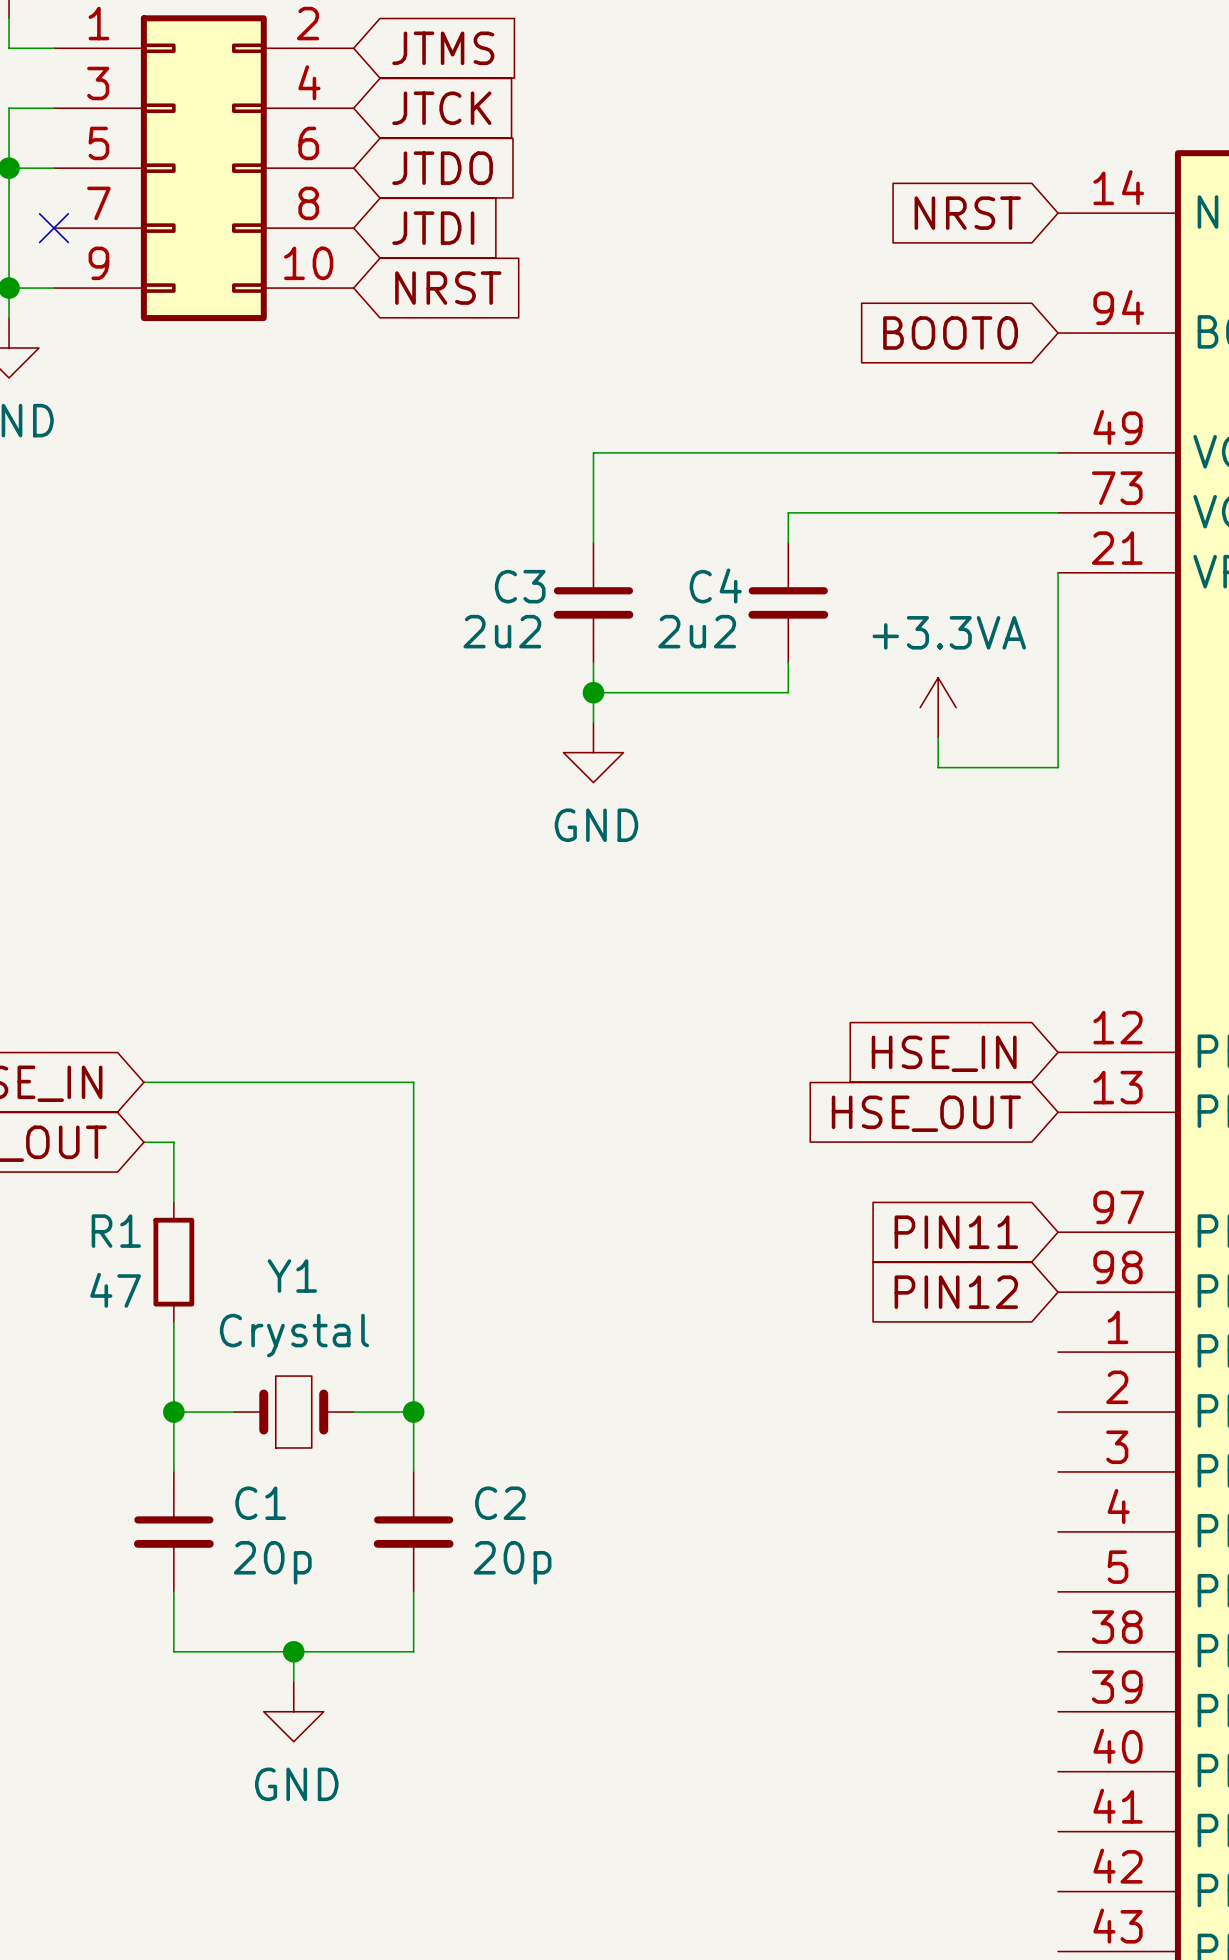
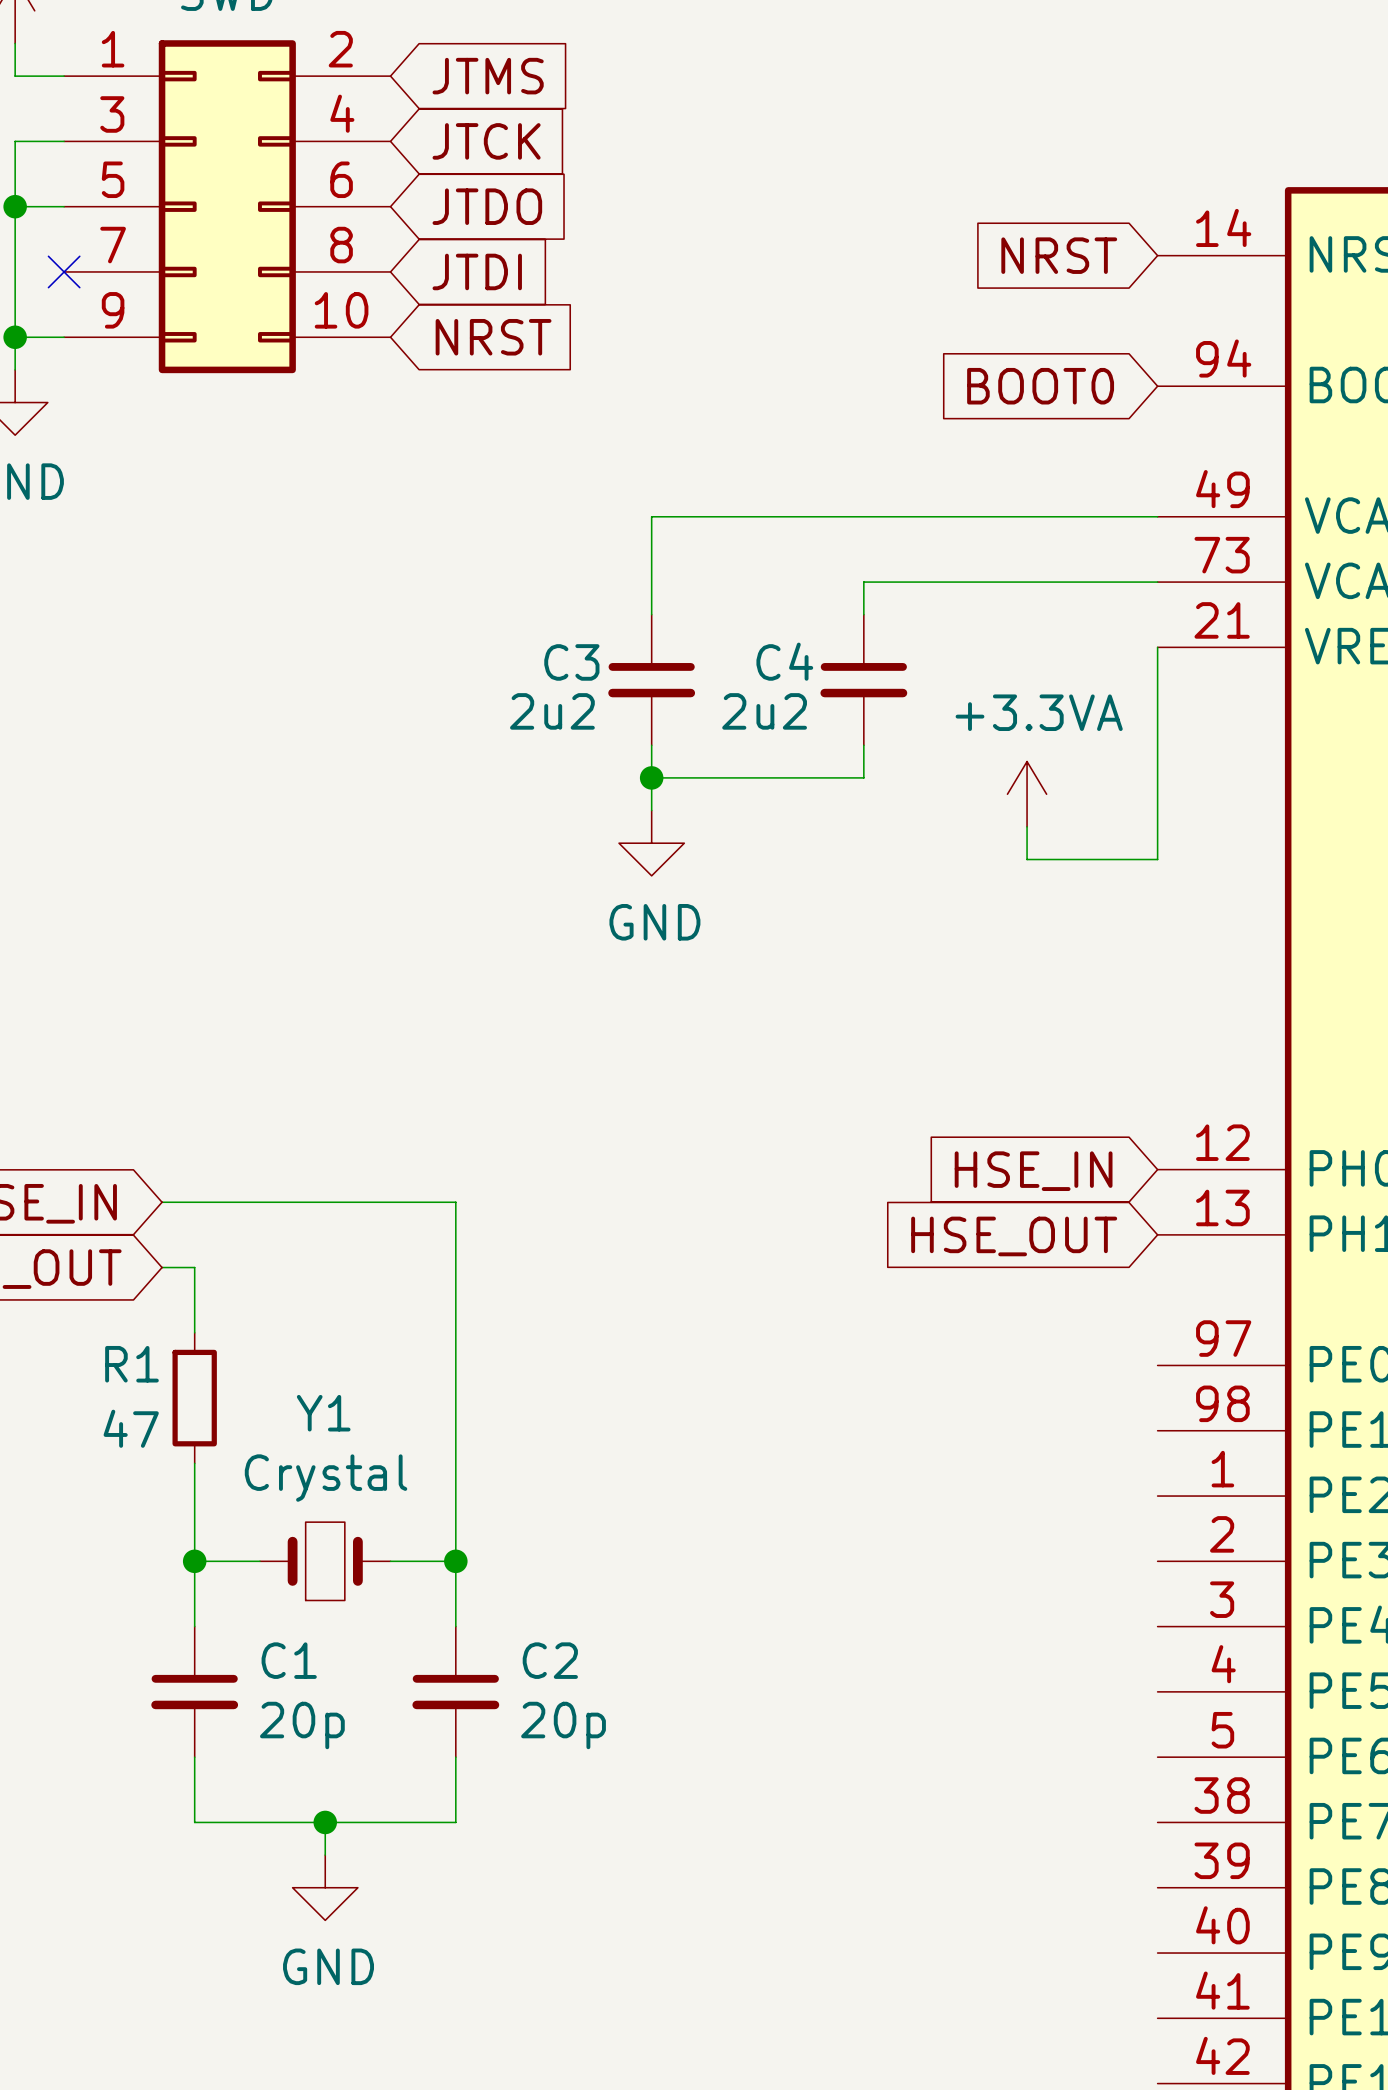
global label: PIN11 (956, 1232) -> none
global label: PIN12 (956, 1292) -> none

